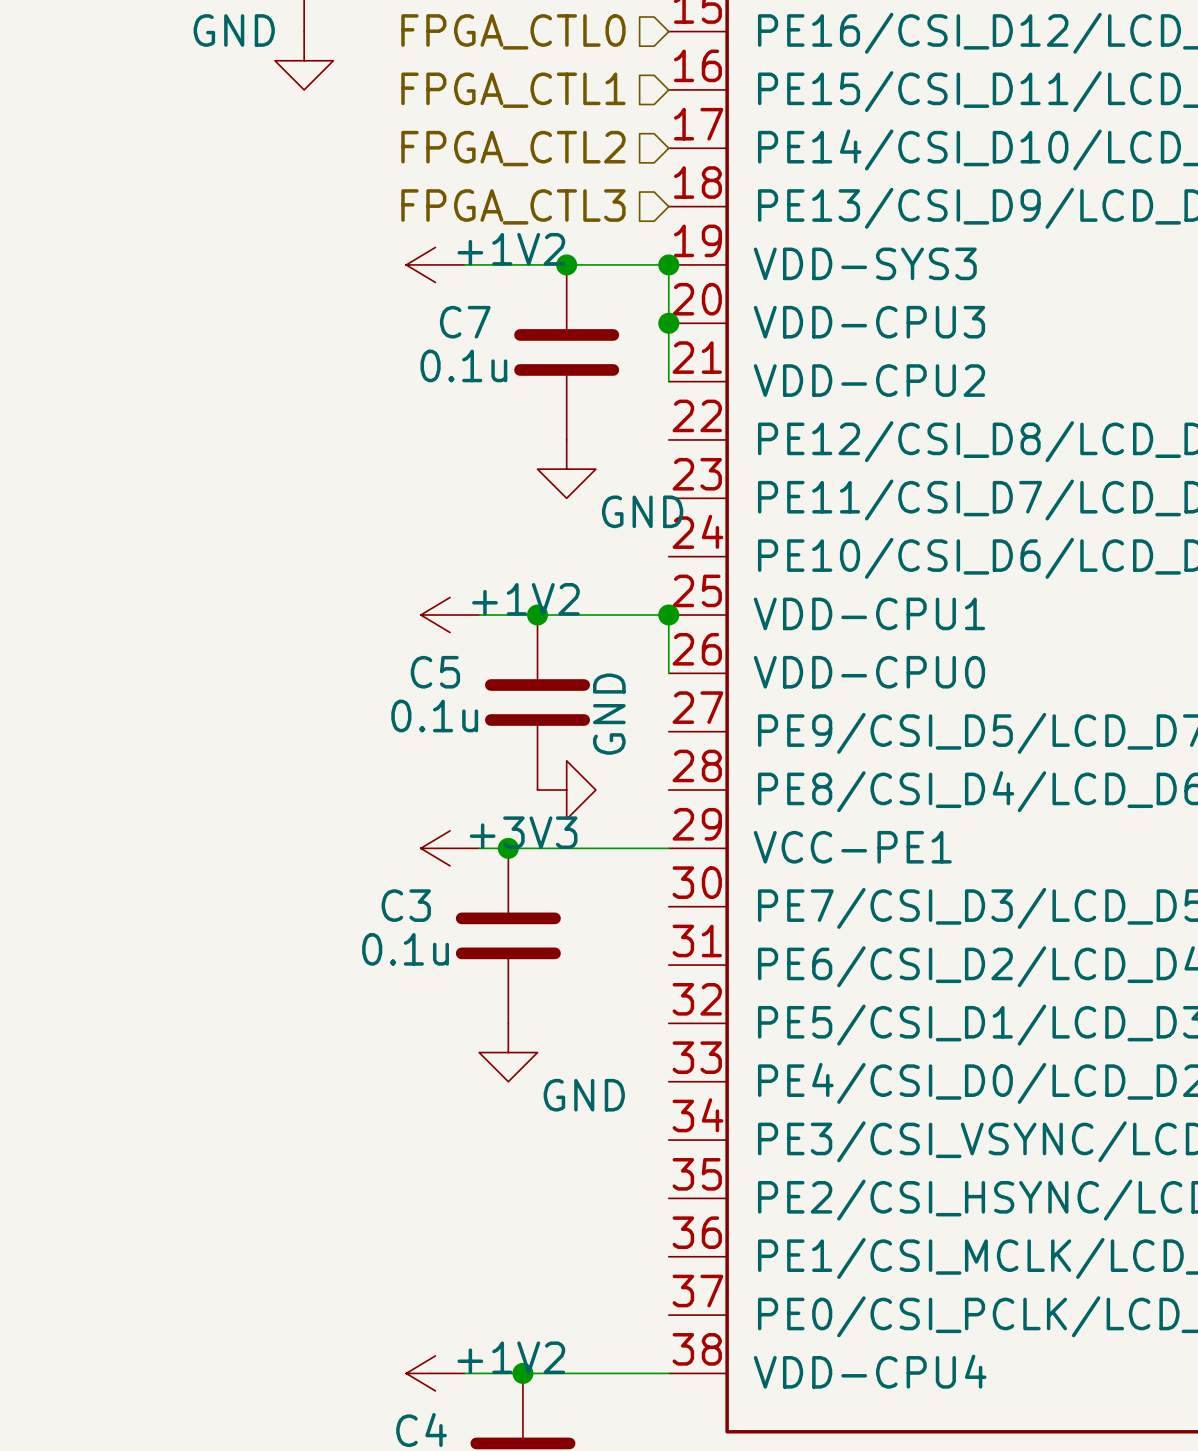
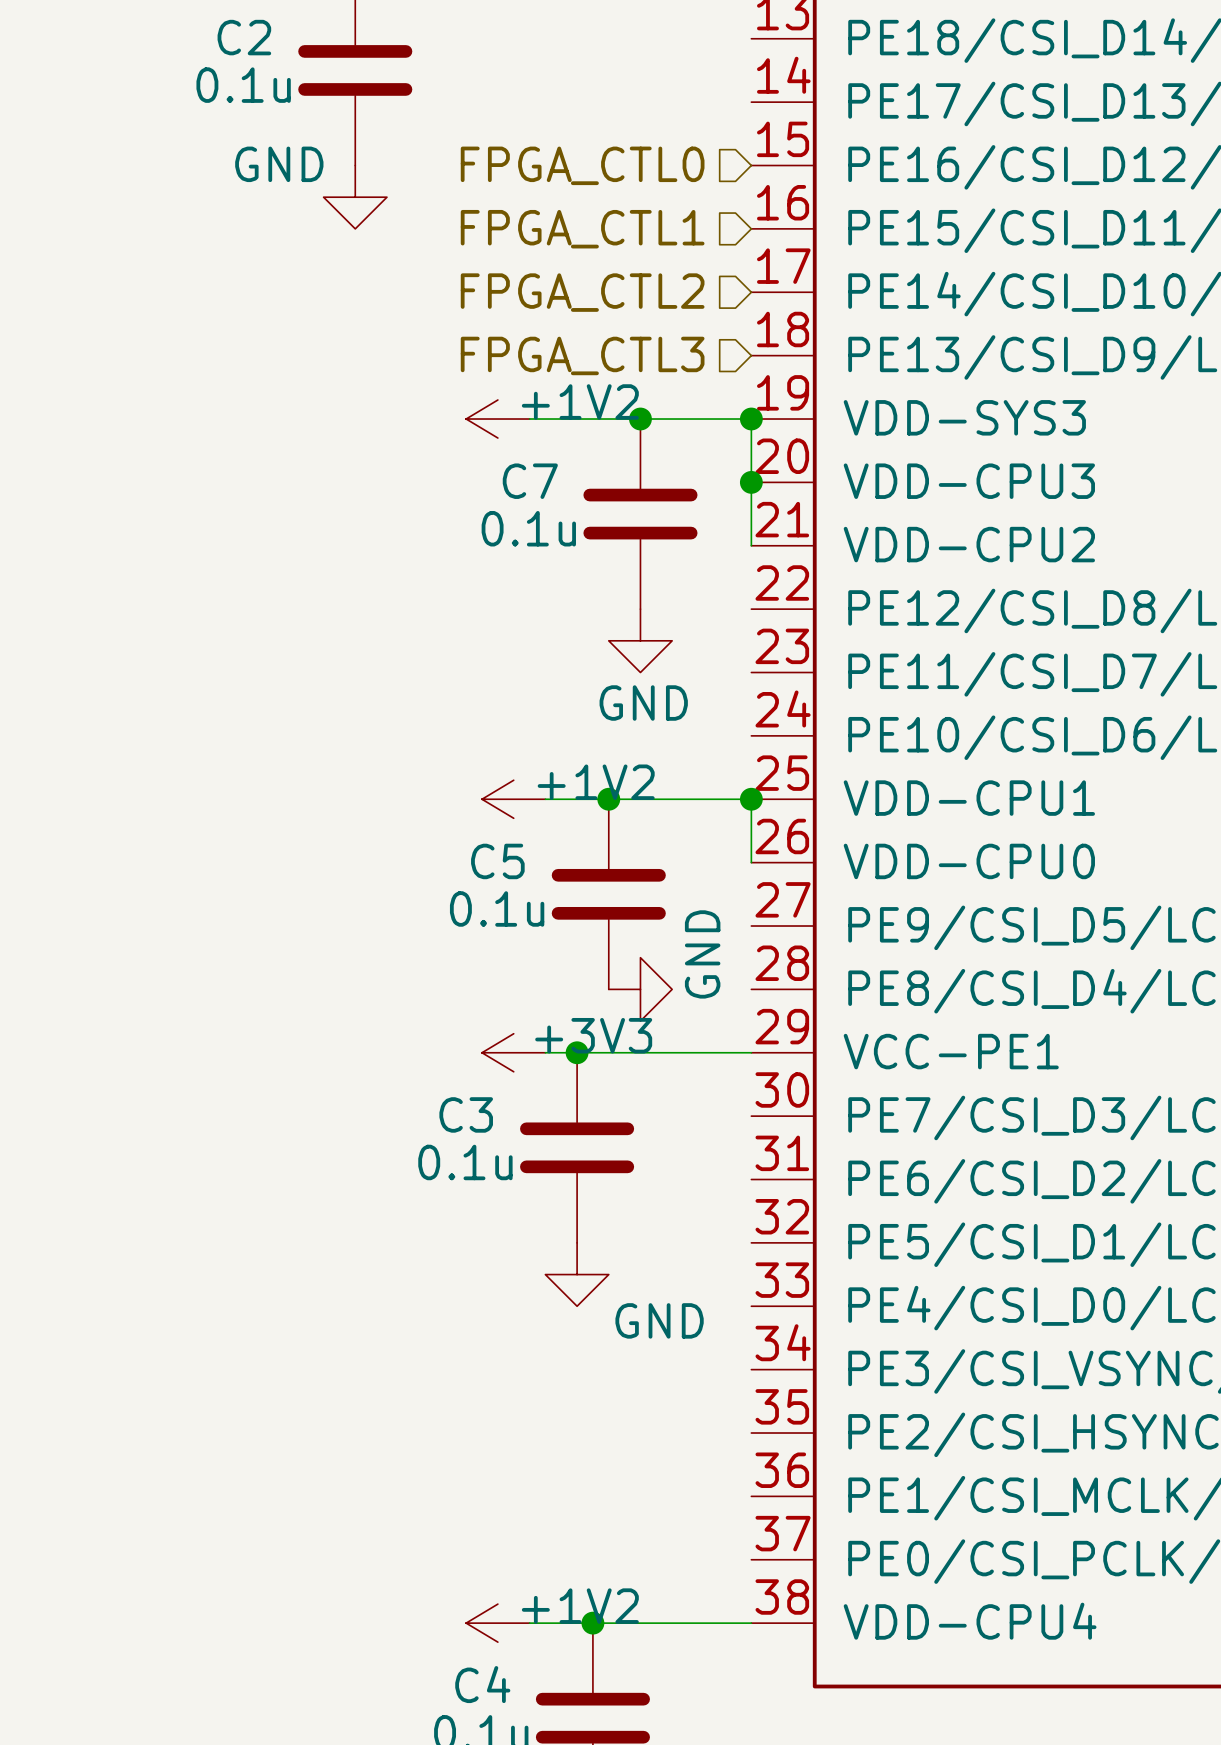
power symbol text position: GND (642, 511) -> GND (643, 703)
power symbol text position: GND (609, 714) -> GND (702, 954)

